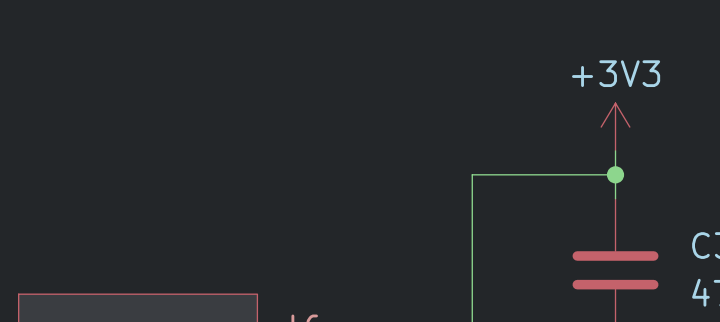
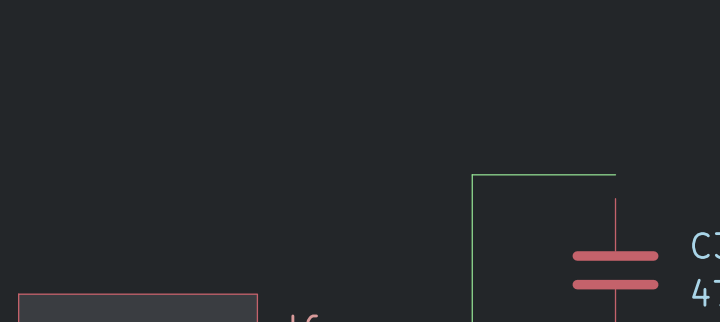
power symbol: +3V3 (615, 127) -> none
wire: (615, 150) (615, 198) -> none
junction: (615, 174) -> none

